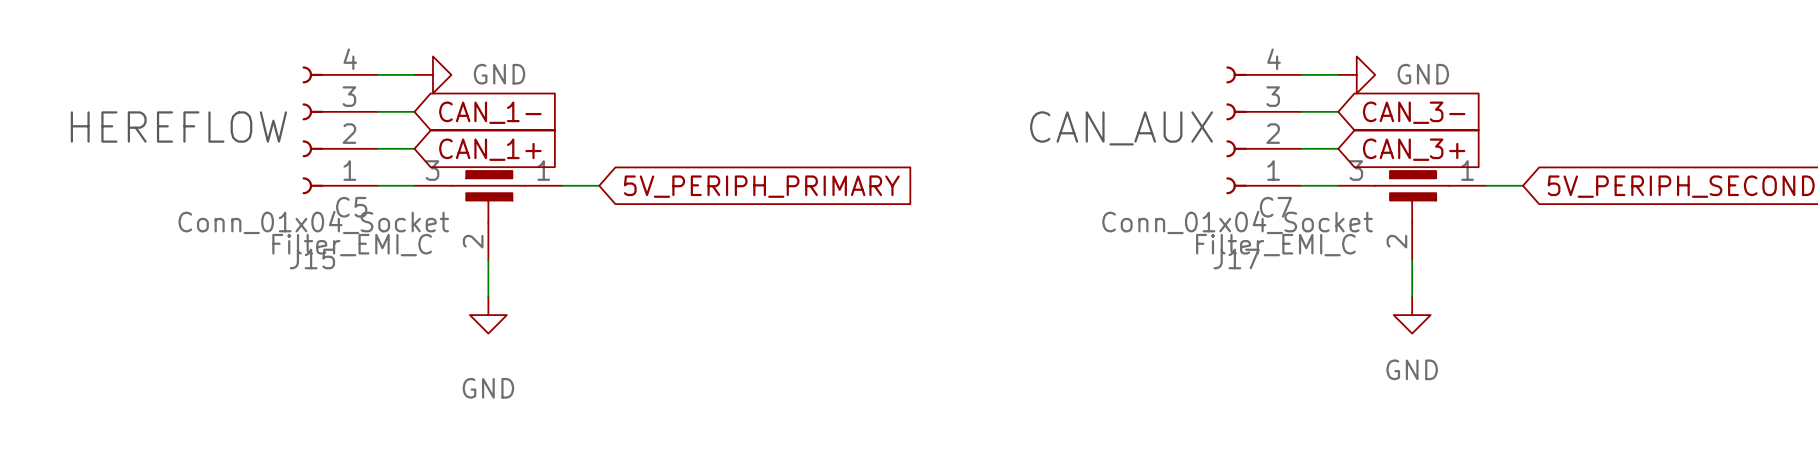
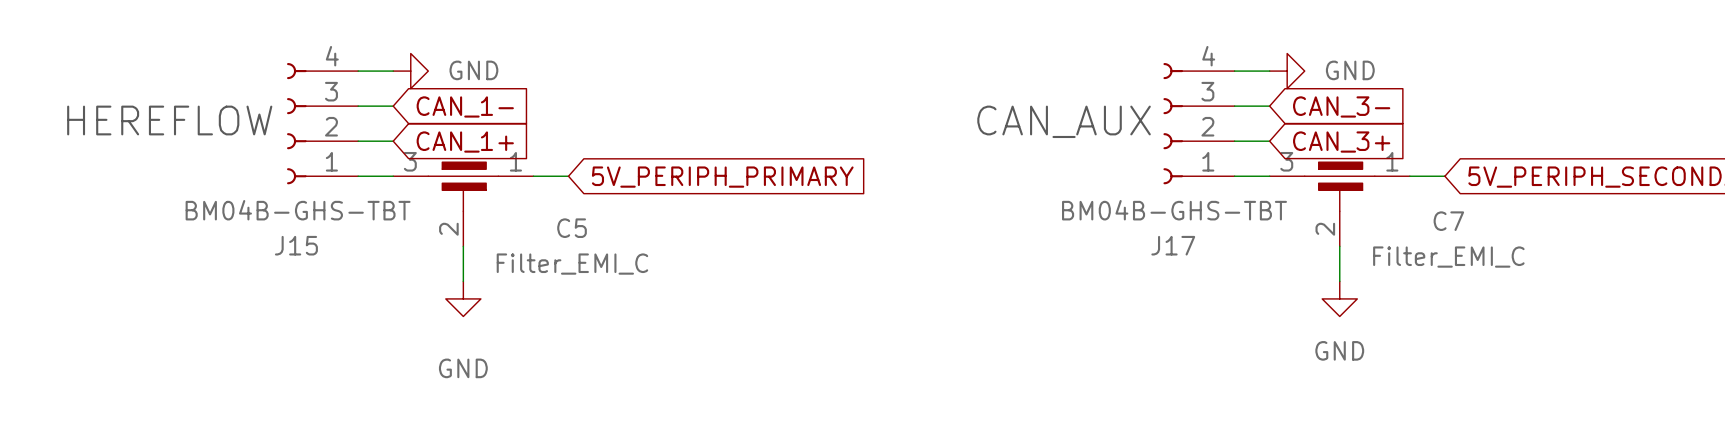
C5 name position: C5 (351, 207) -> C5 (572, 228)
C7 name position: C7 (1275, 207) -> C7 (1448, 221)
J15 value: Conn_01x04_Socket (313, 222) -> BM04B-GHS-TBT (298, 210)
J17 value: Conn_01x04_Socket (1237, 222) -> BM04B-GHS-TBT (1174, 210)
C5 value position: Filter_EMI_C (352, 245) -> Filter_EMI_C (572, 264)
C7 value position: Filter_EMI_C (1275, 245) -> Filter_EMI_C (1448, 257)

